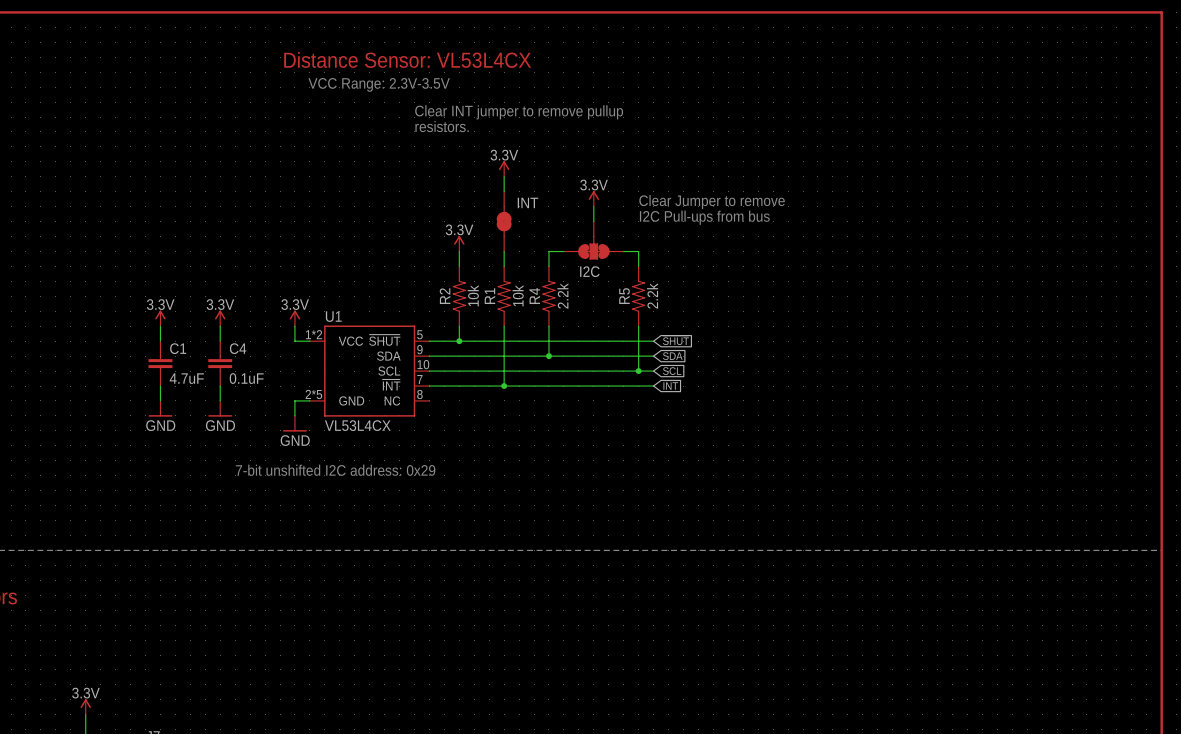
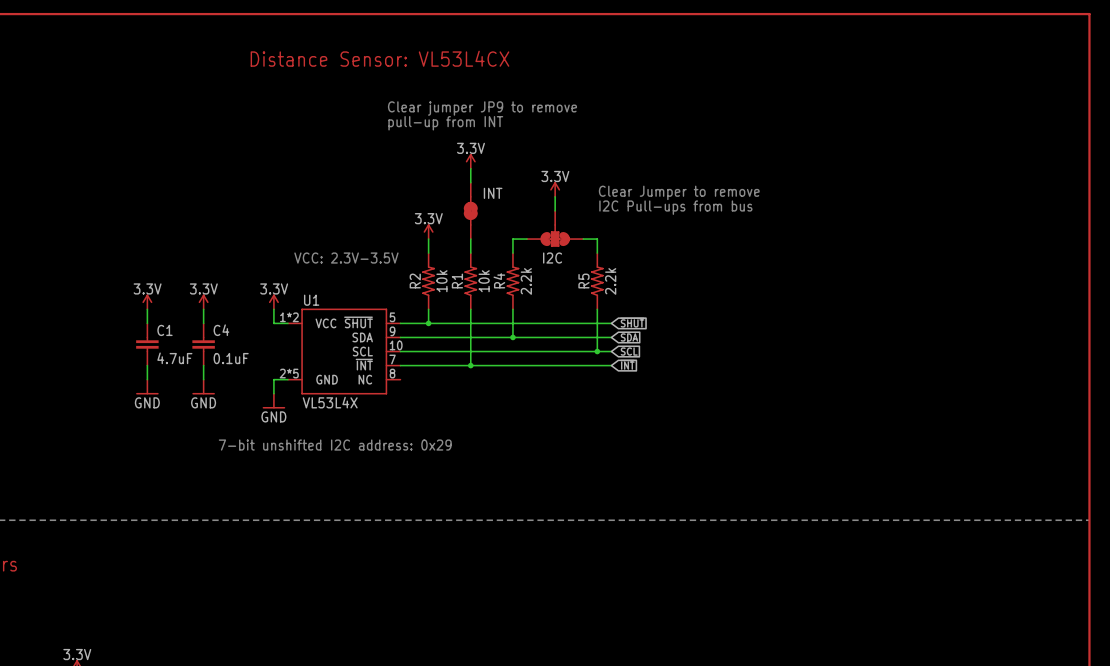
text: VCC Range: 2.3V-3.5V (379, 84) -> none
text: Clear INT jumper to remove pullup (519, 112) -> Clear jumper JP9 to remove (482, 108)
text: resistors. (442, 126) -> pull-up from INT (445, 123)
text: none -> VCC: 2.3V-3.5V (346, 258)
U1 value: VL53L4CX (357, 425) -> VL53L4X (330, 402)

